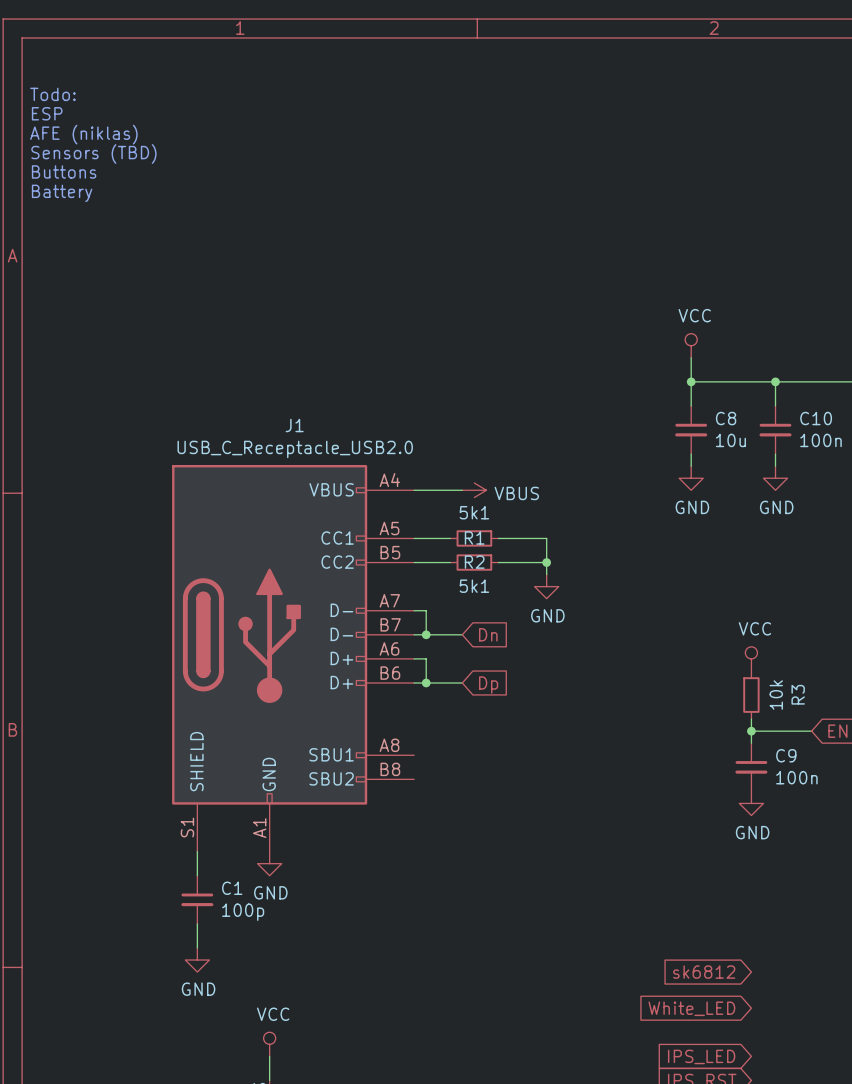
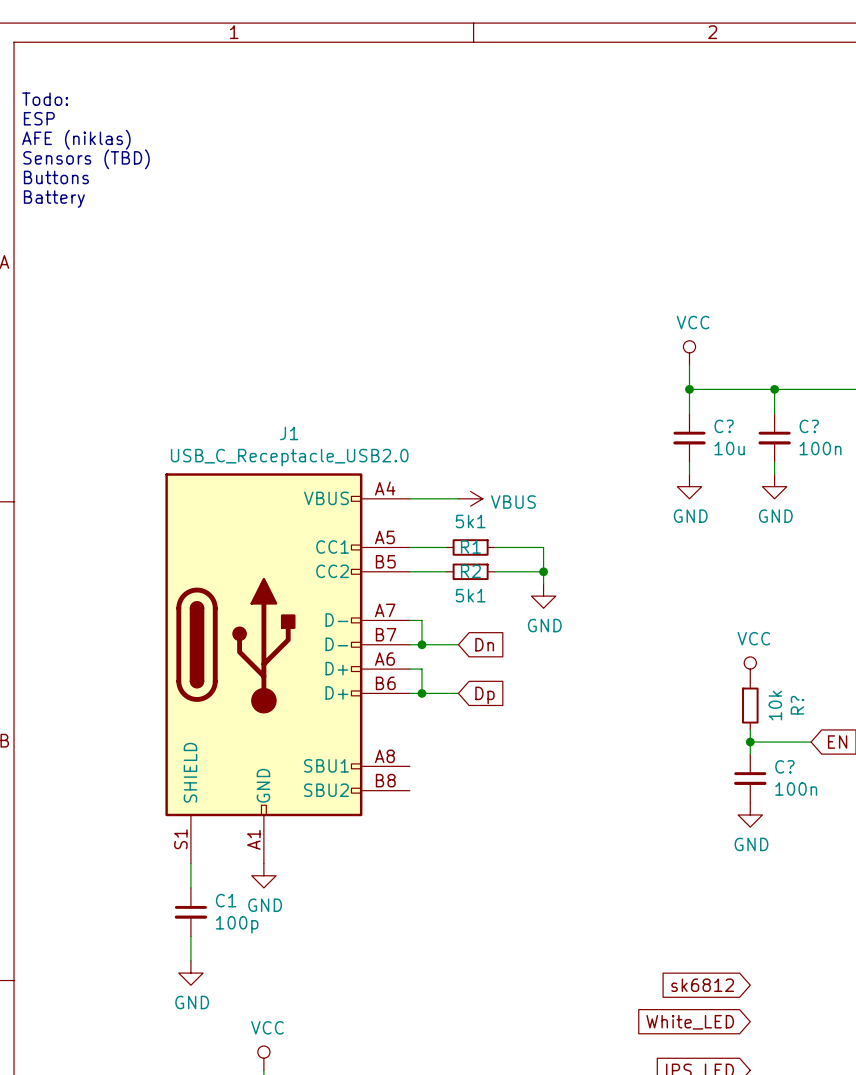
C8 name: C8 (726, 418) -> C? (724, 426)
C10 name: C10 (816, 418) -> C? (809, 426)
R3 name: R3 (798, 694) -> R? (797, 705)
C9 name: C9 (786, 755) -> C? (784, 766)

